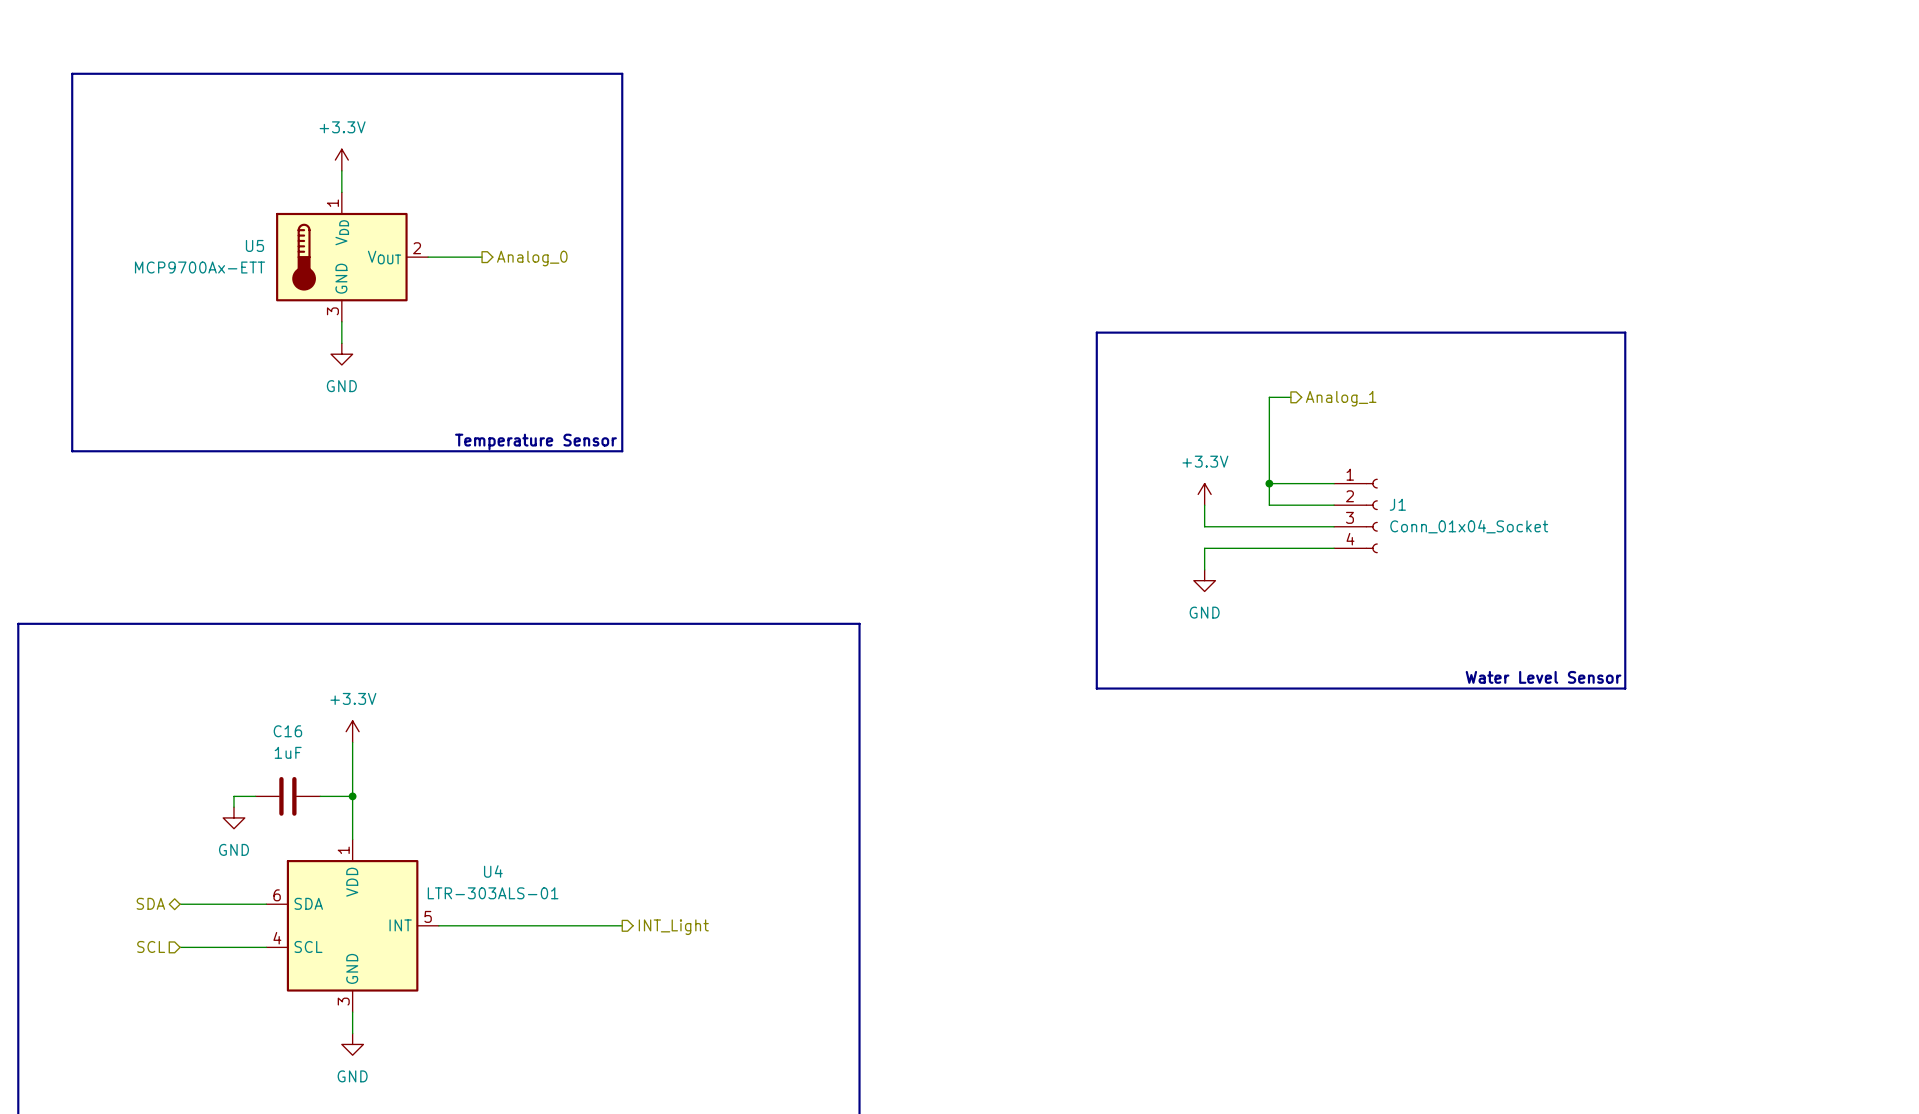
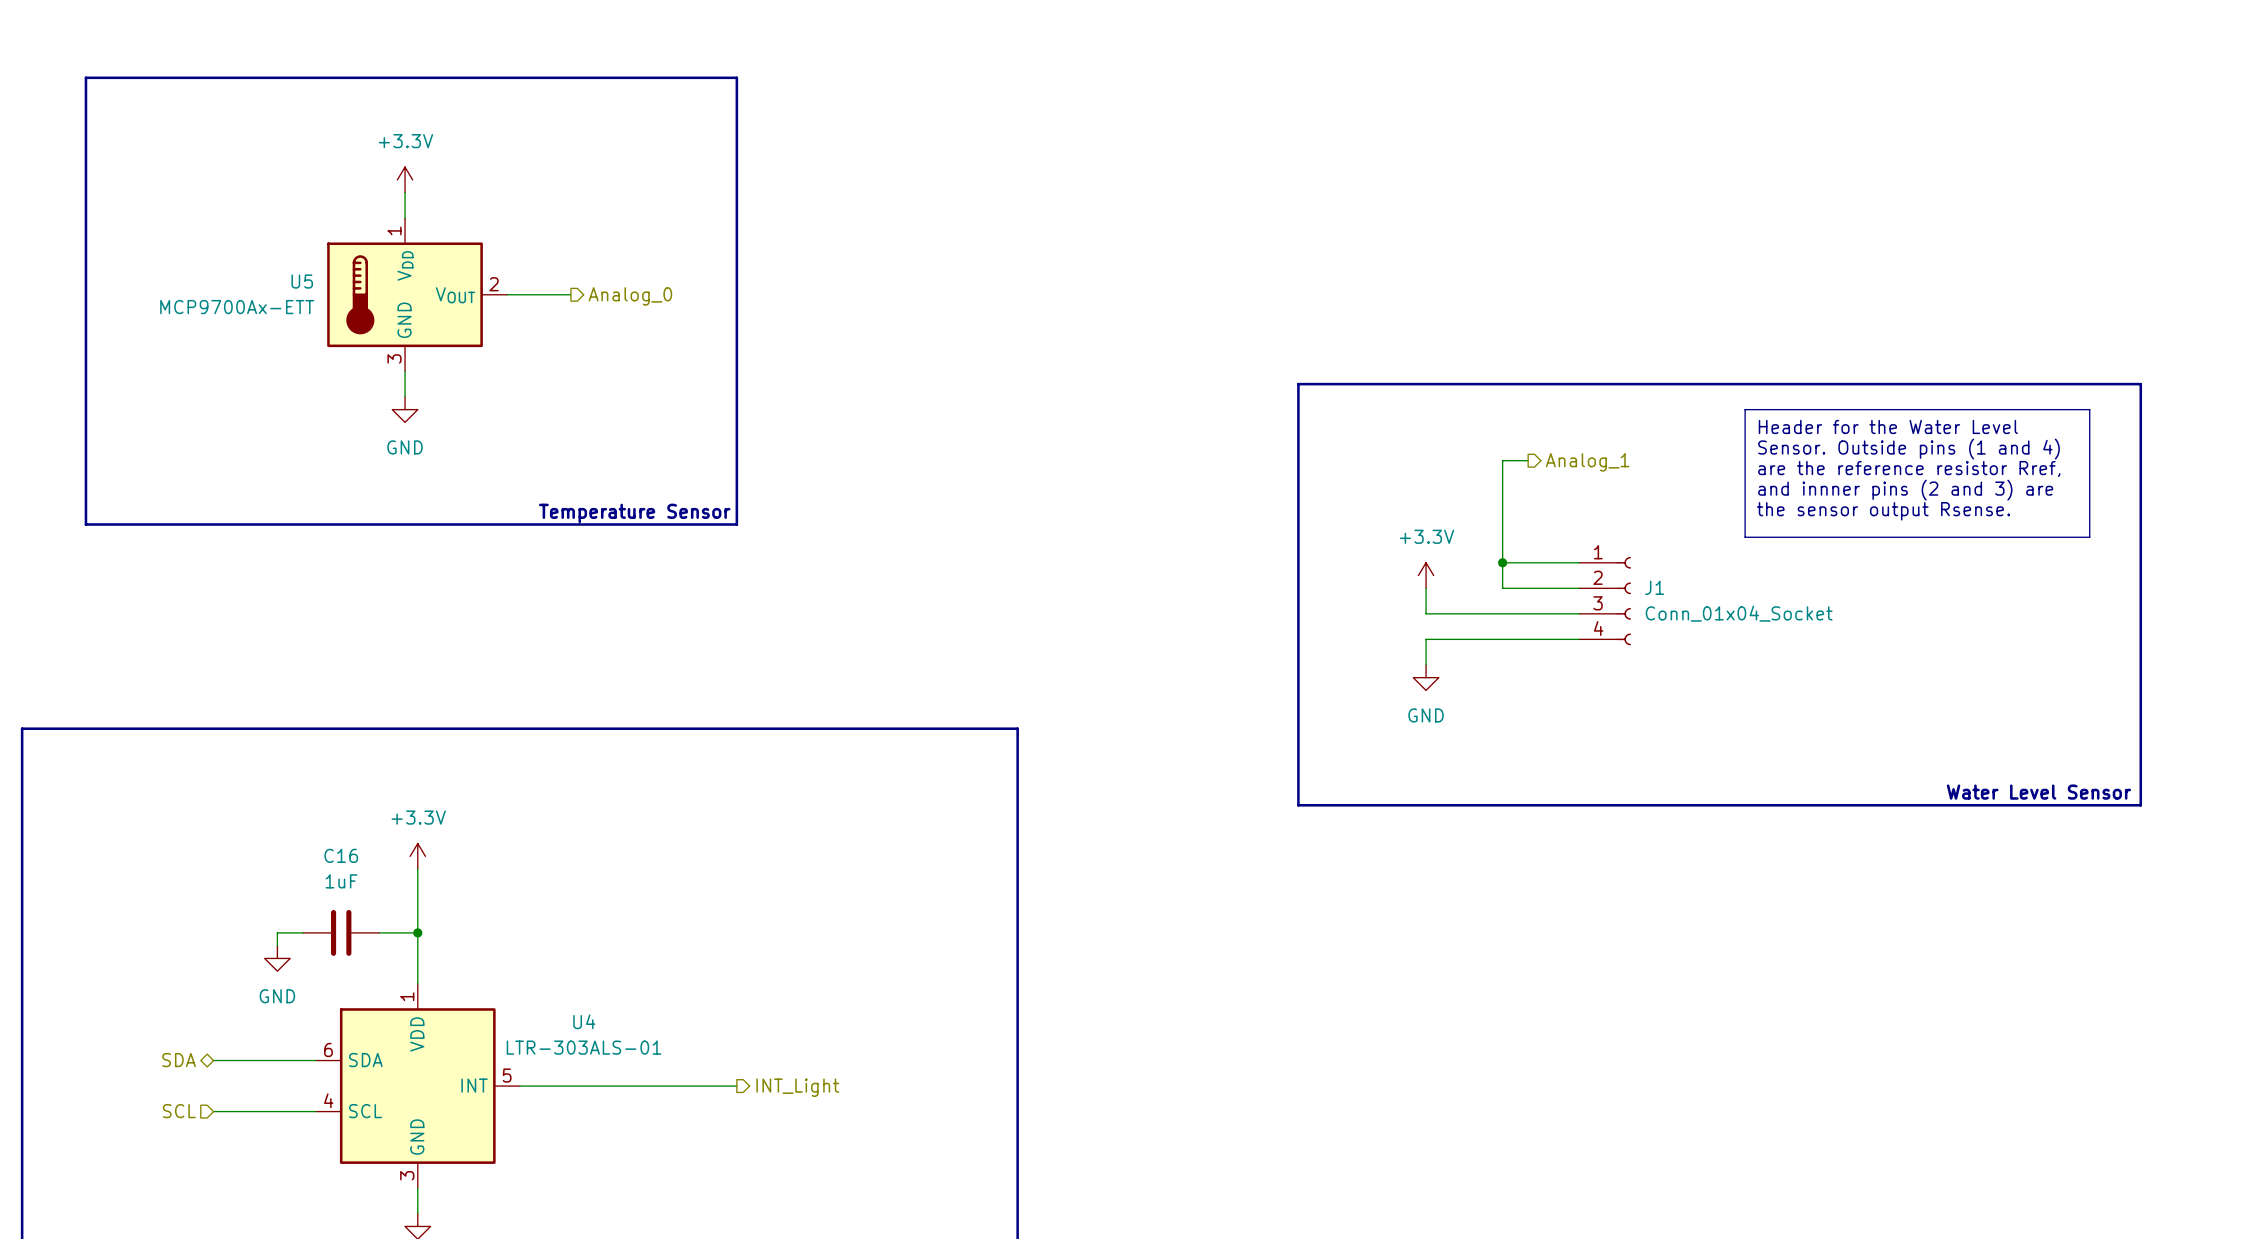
line: (1625, 332) (1625, 688) -> (1923, 384) (2140, 384) (2140, 805) (1923, 805)
line: none -> (1745, 409) (2089, 409) (2089, 537) (1745, 537) (1745, 409)
text: none -> Header for the Water Level (1888, 426)
text: none -> Sensor. Outside pins (1 and 4) (1909, 449)
text: none -> are the reference resistor Rref, (1909, 468)
text: none -> and innner pins (2 and 3) are (1905, 490)
text: none -> the sensor output Rsense. (1883, 511)
text position: Water Level Sensor (1543, 677) -> Water Level Sensor (2038, 792)

